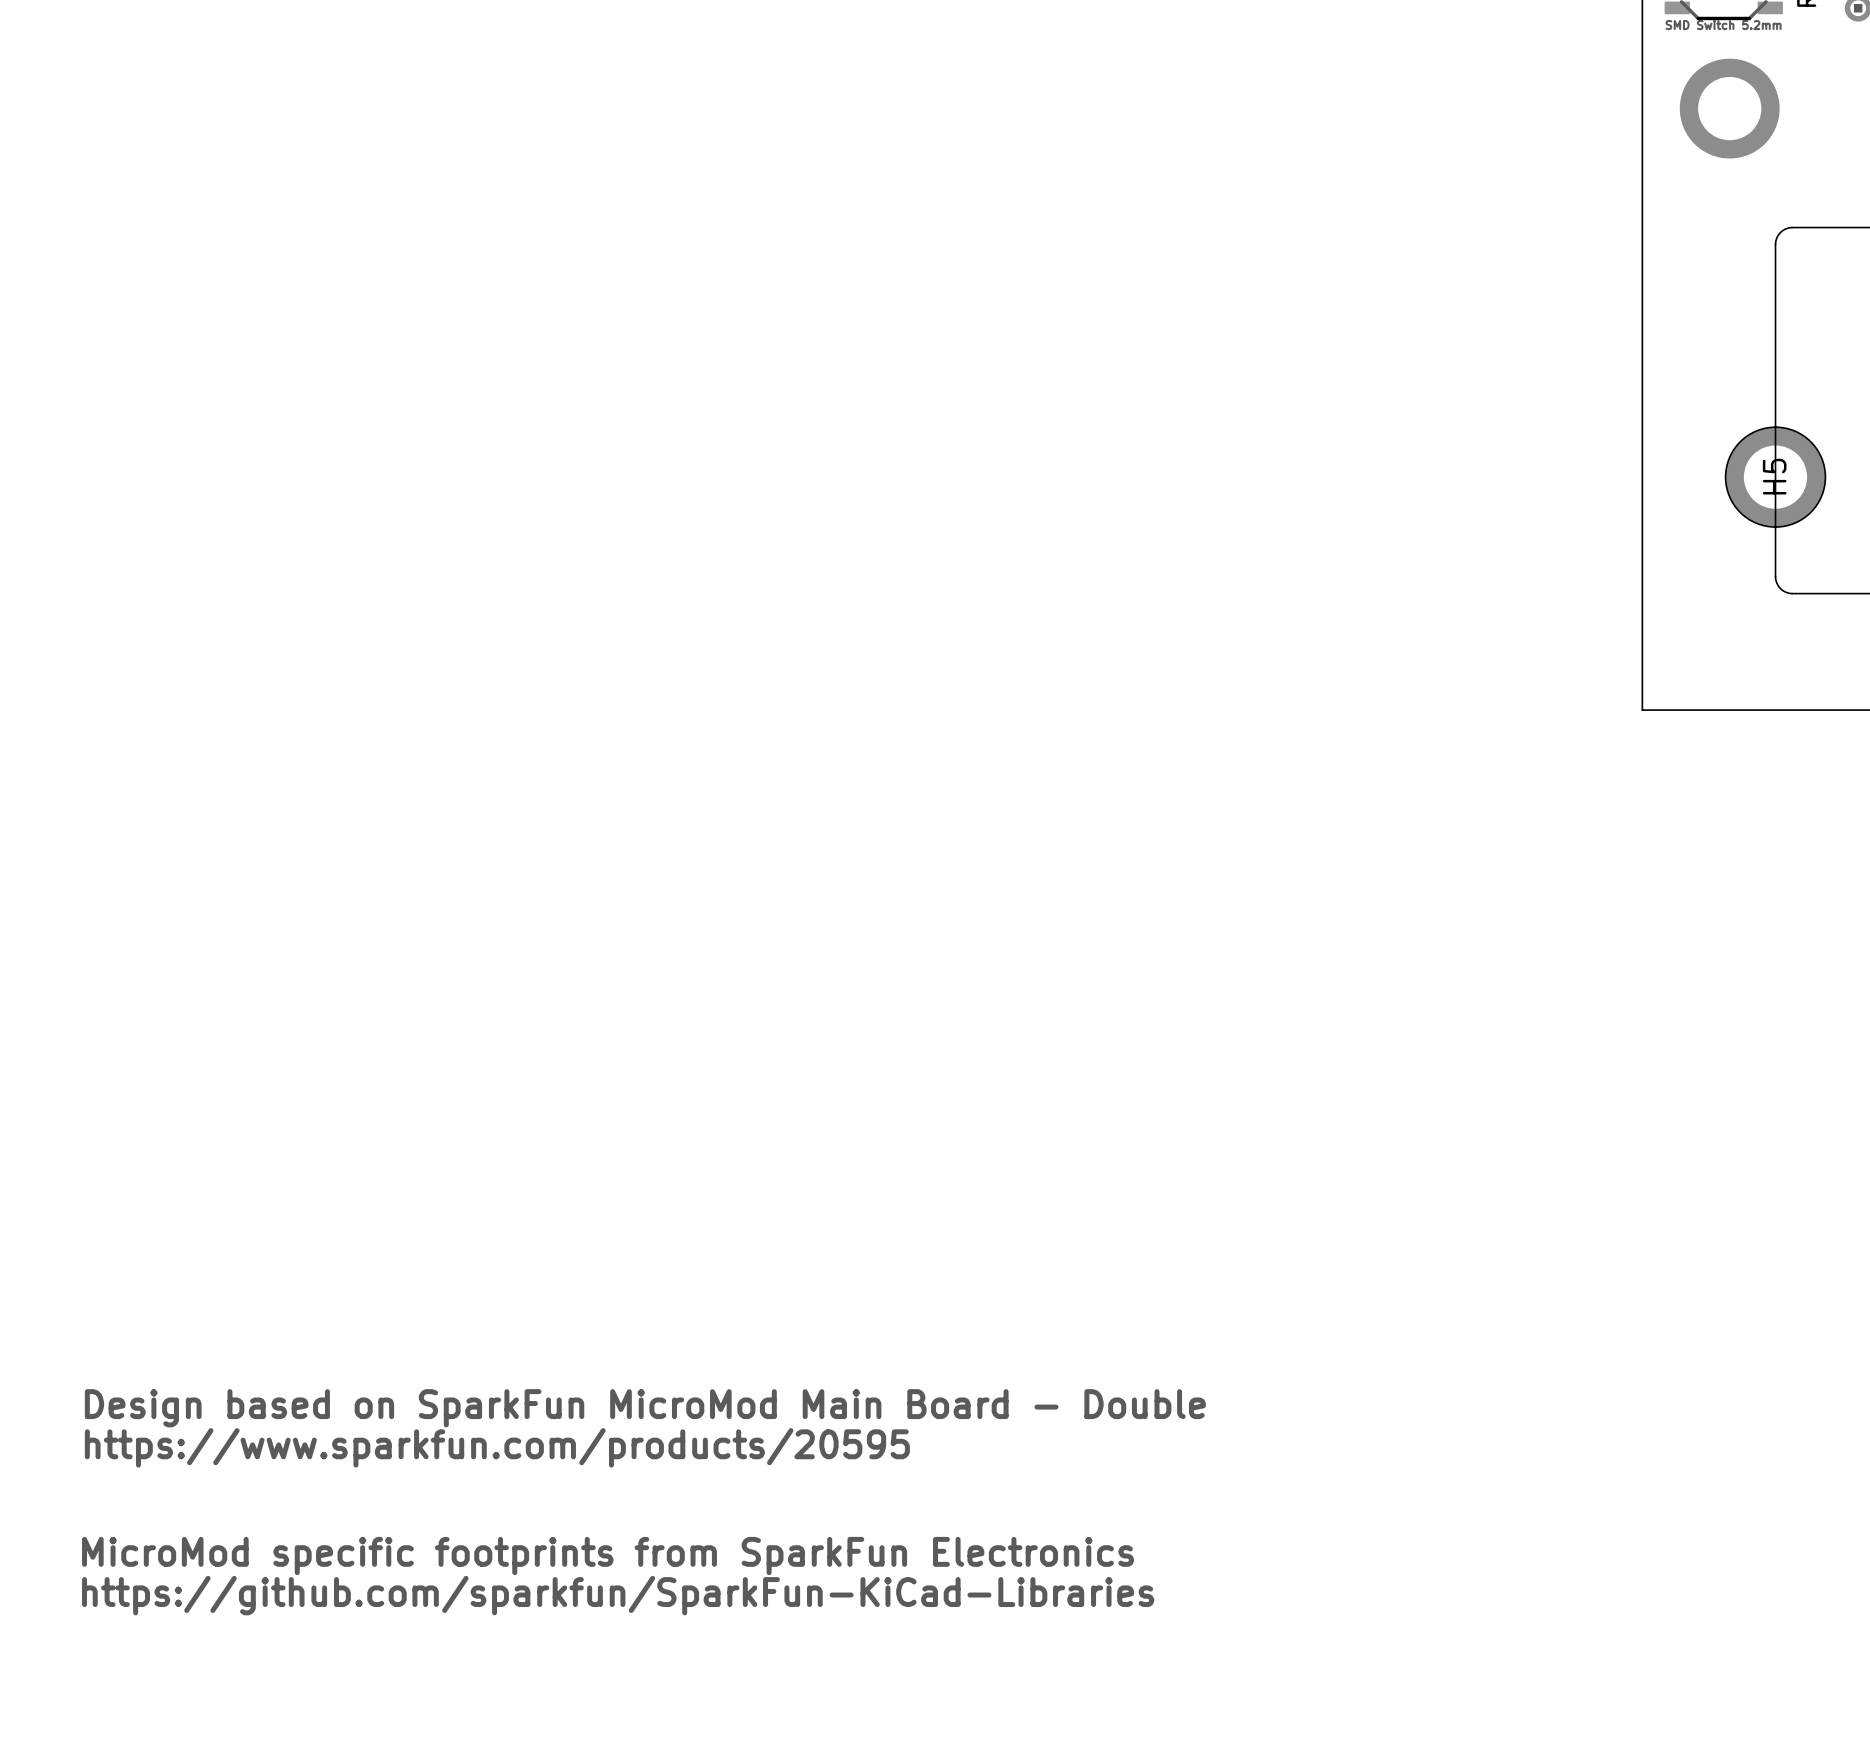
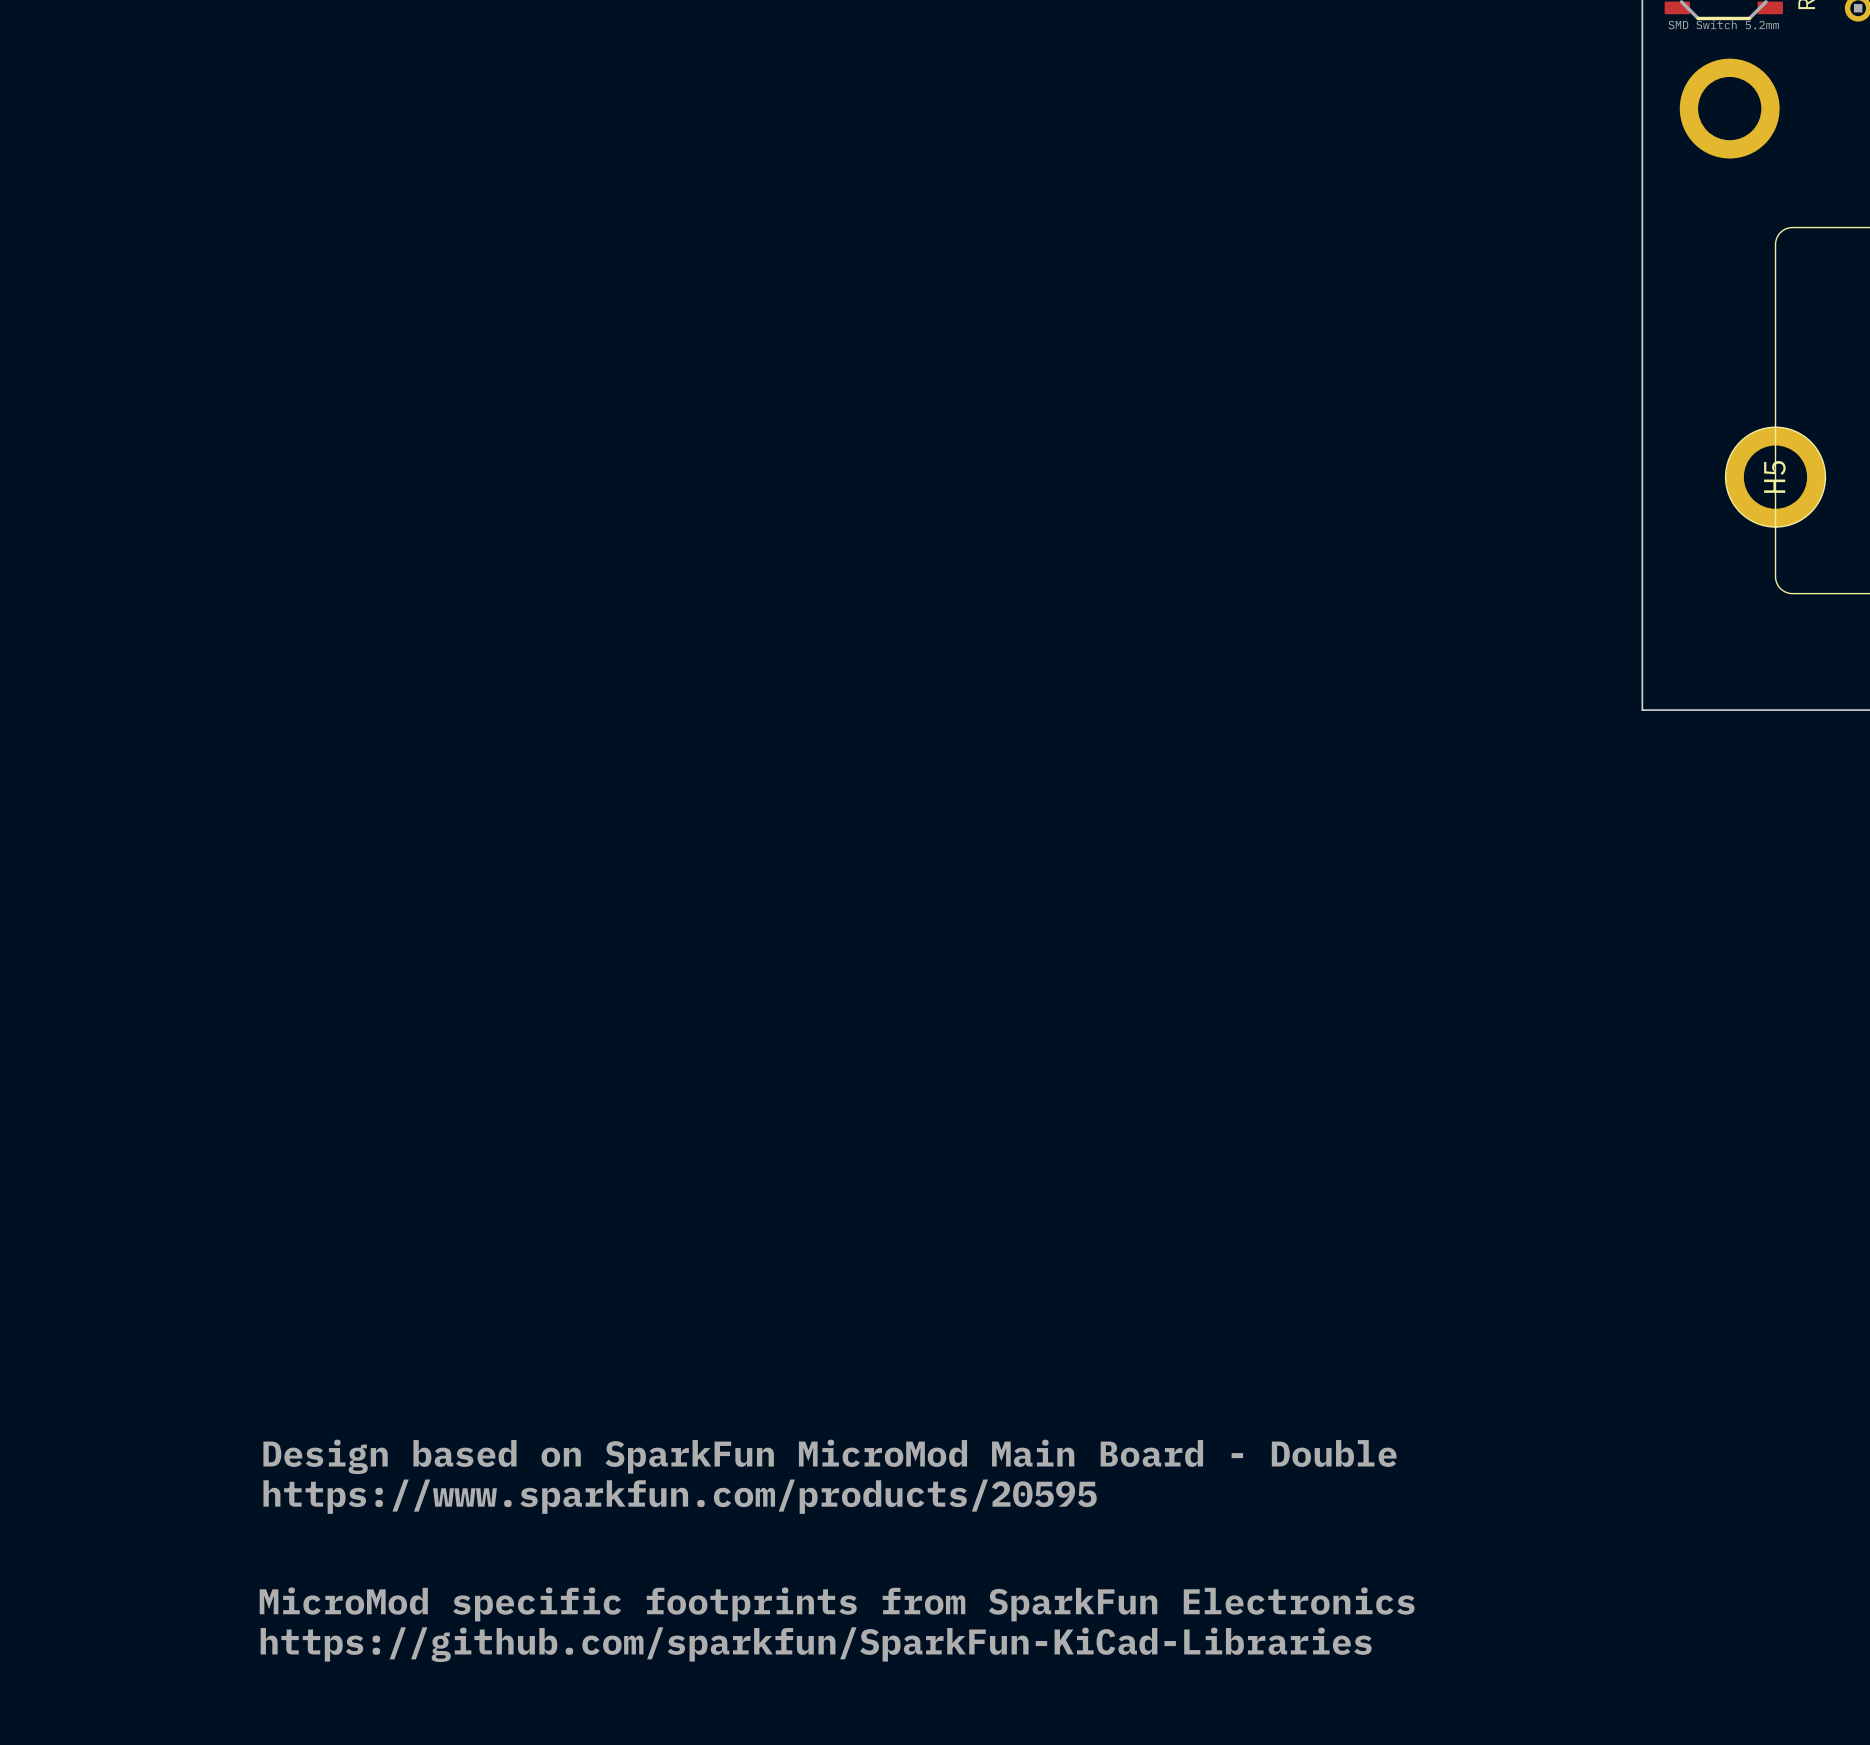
text position: Design based on SparkFun MicroMod Main Board - Double (645, 1408) -> Design based on SparkFun MicroMod Main Board - Double (829, 1456)
text position: https://www.sparkfun.com/products/20595 (497, 1447) -> https://www.sparkfun.com/products/20595 (680, 1496)
text position: MicroMod specific footprints from SparkFun Electronics (608, 1556) -> MicroMod specific footprints from SparkFun Electronics (837, 1604)
text position: https://github.com/sparkfun/SparkFun-KiCad-Libraries (618, 1595) -> https://github.com/sparkfun/SparkFun-KiCad-Libraries (816, 1644)

